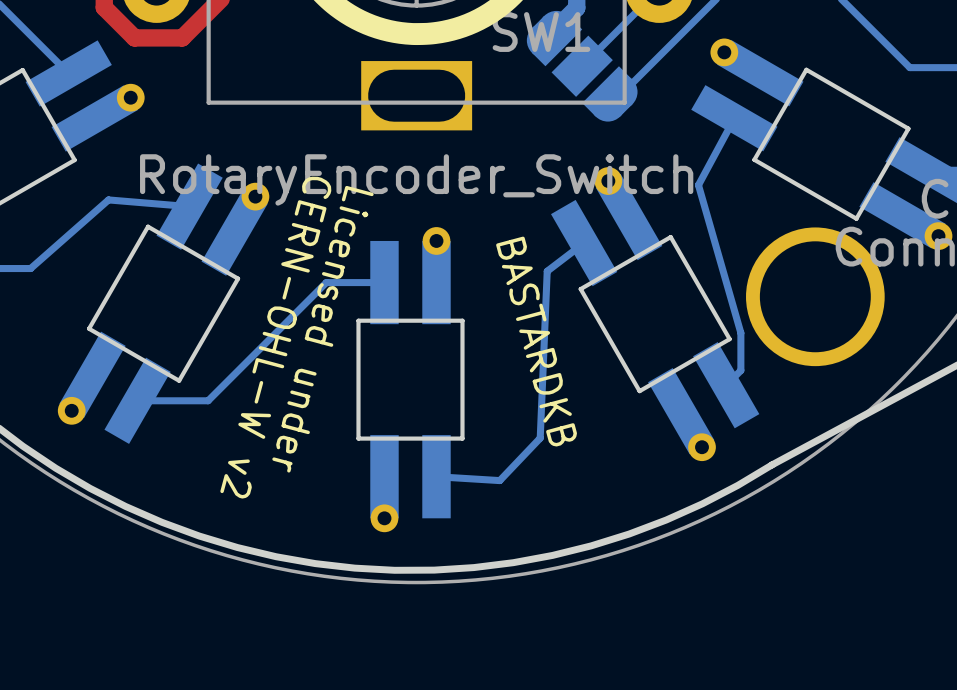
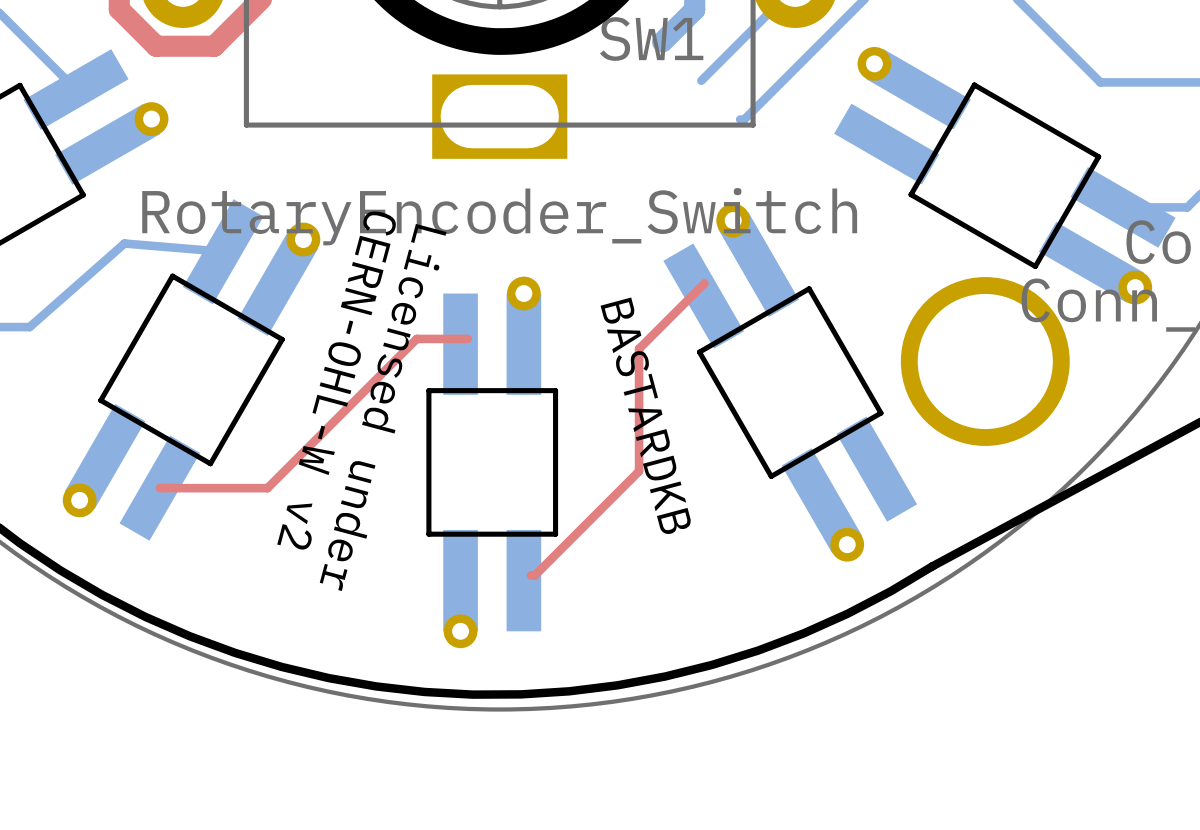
part: (582, 66) -> none
bottom track: (734, 118) (698, 185) (740, 332) (740, 370) (726, 385) -> none
top track: none -> (704, 283) (639, 348) (639, 471) (534, 575) (530, 575)
bottom track: (584, 243) (547, 271) (540, 438) (499, 480) (436, 476) -> none
top track: none -> (467, 338) (416, 338) (267, 488) (159, 488)
bottom track: (384, 282) (326, 282) (208, 400) (137, 400) -> none

